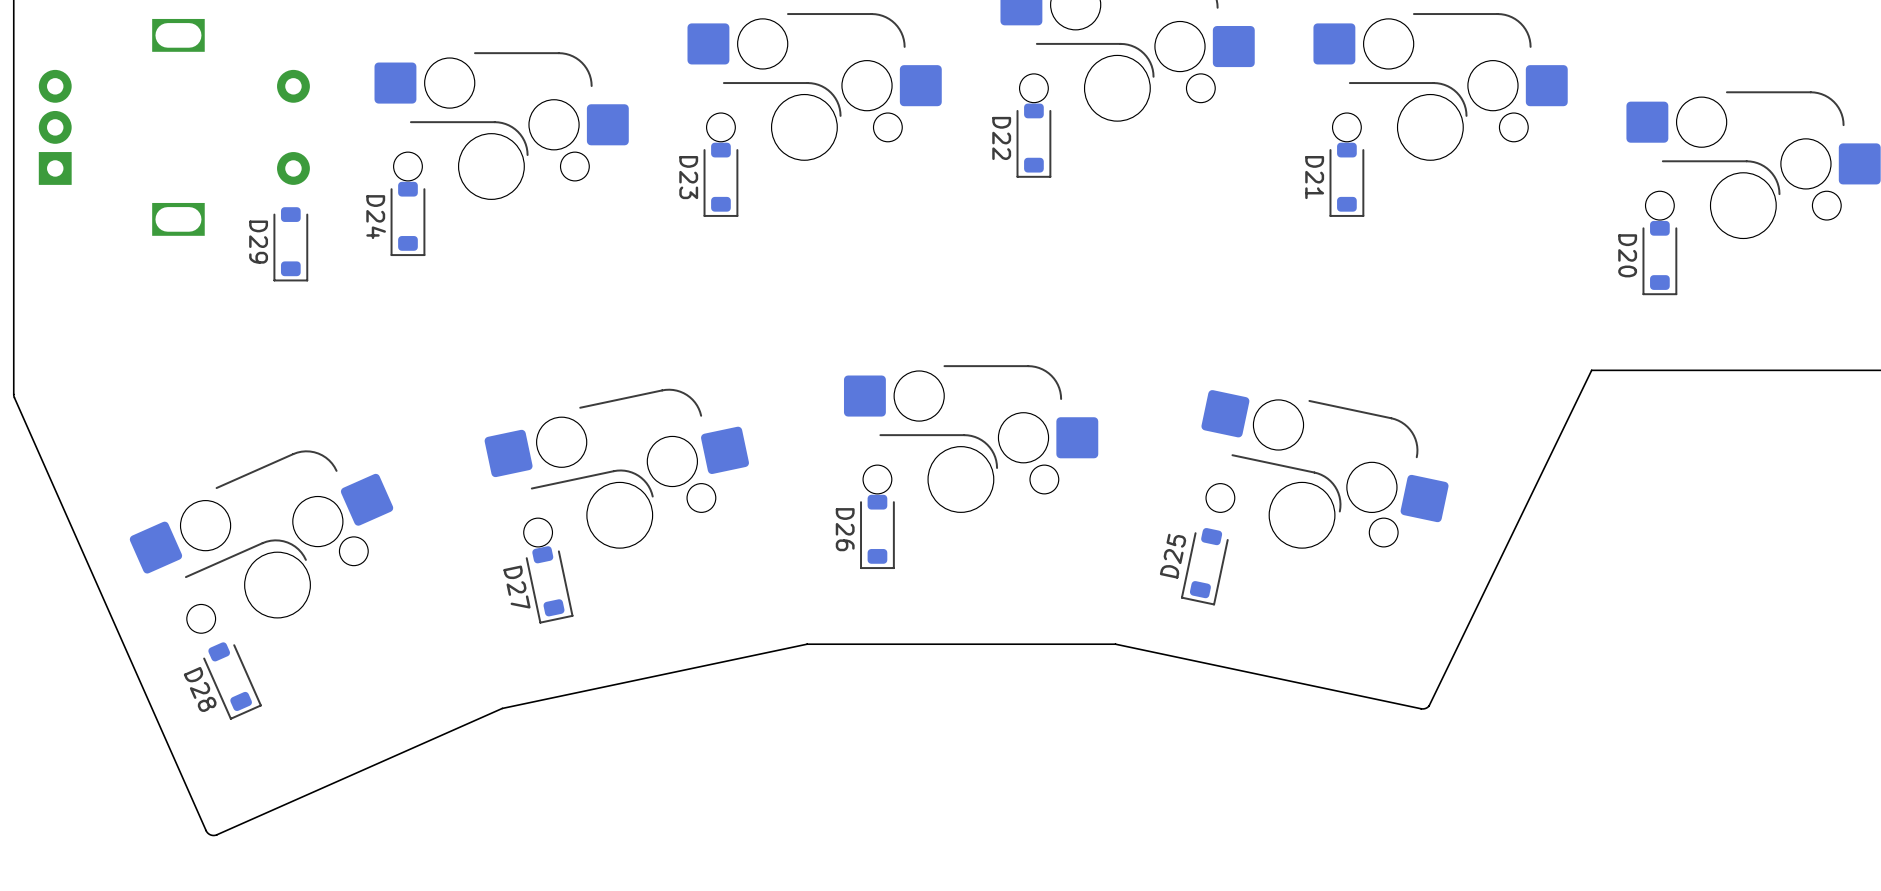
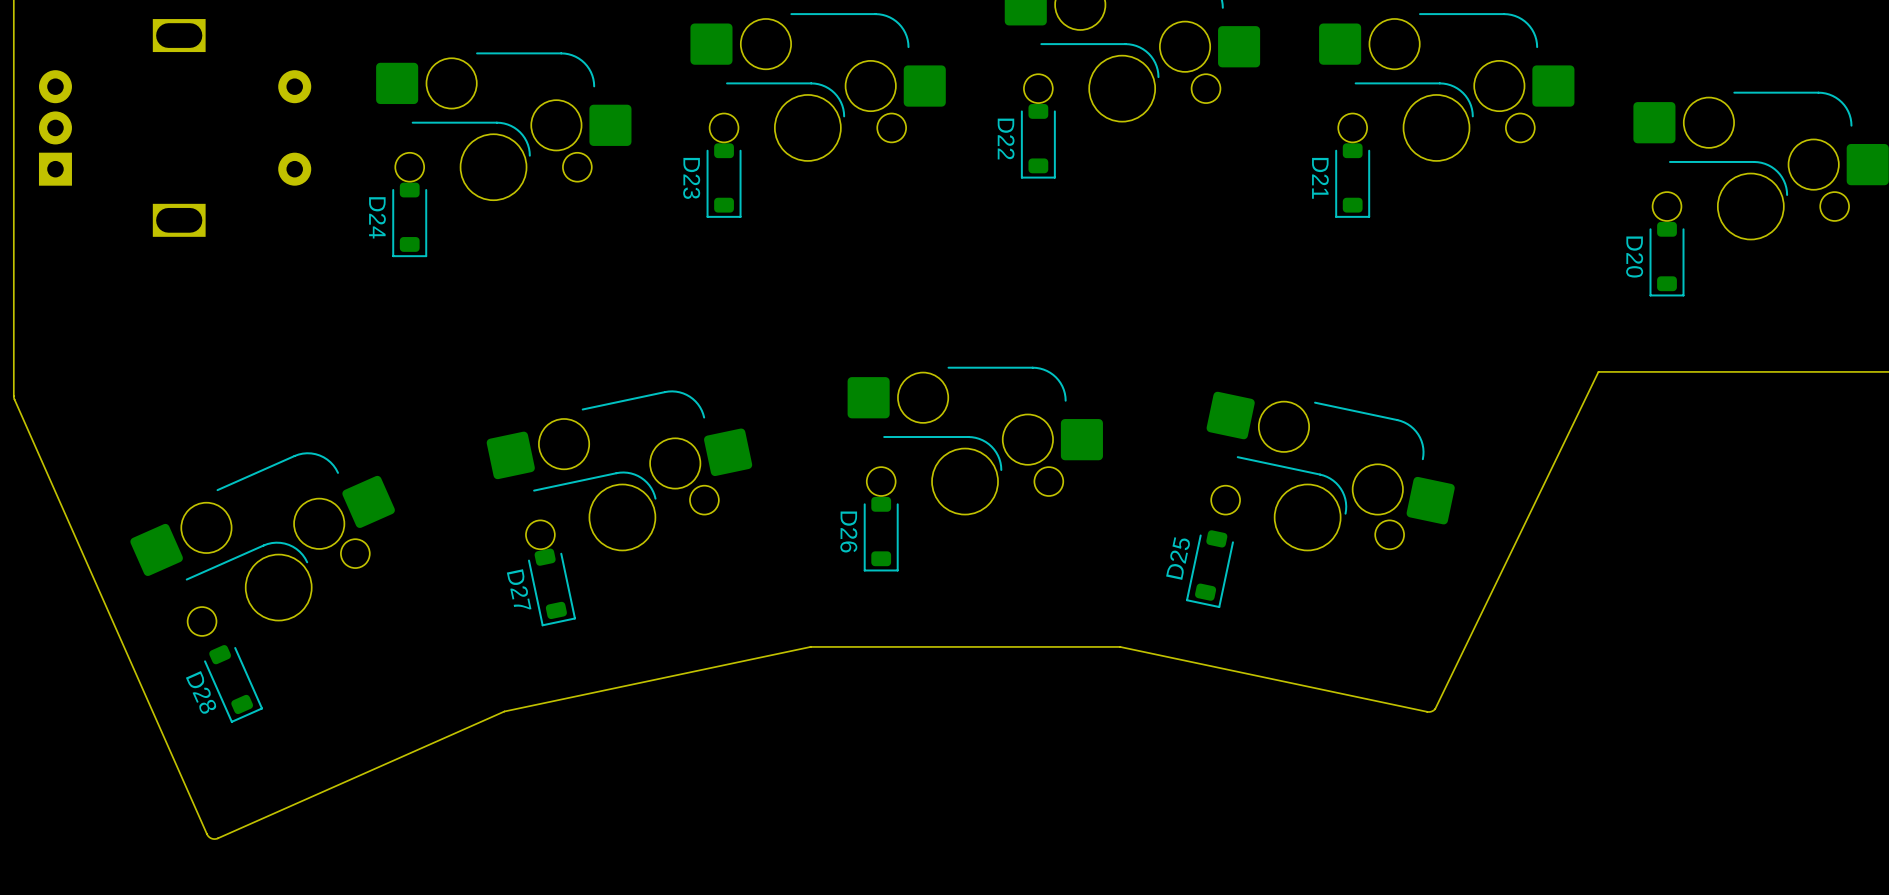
D29: (290, 244) -> none

